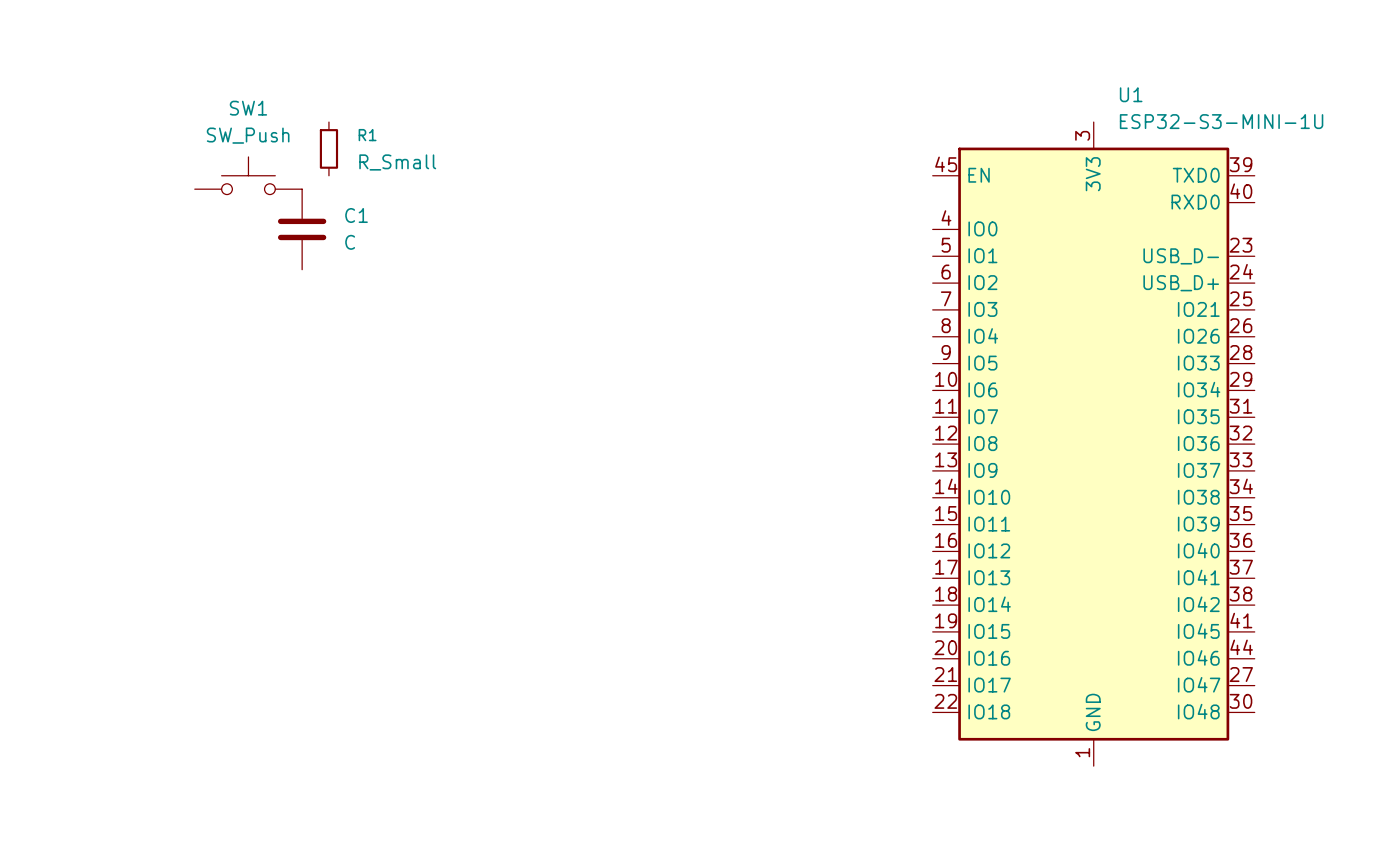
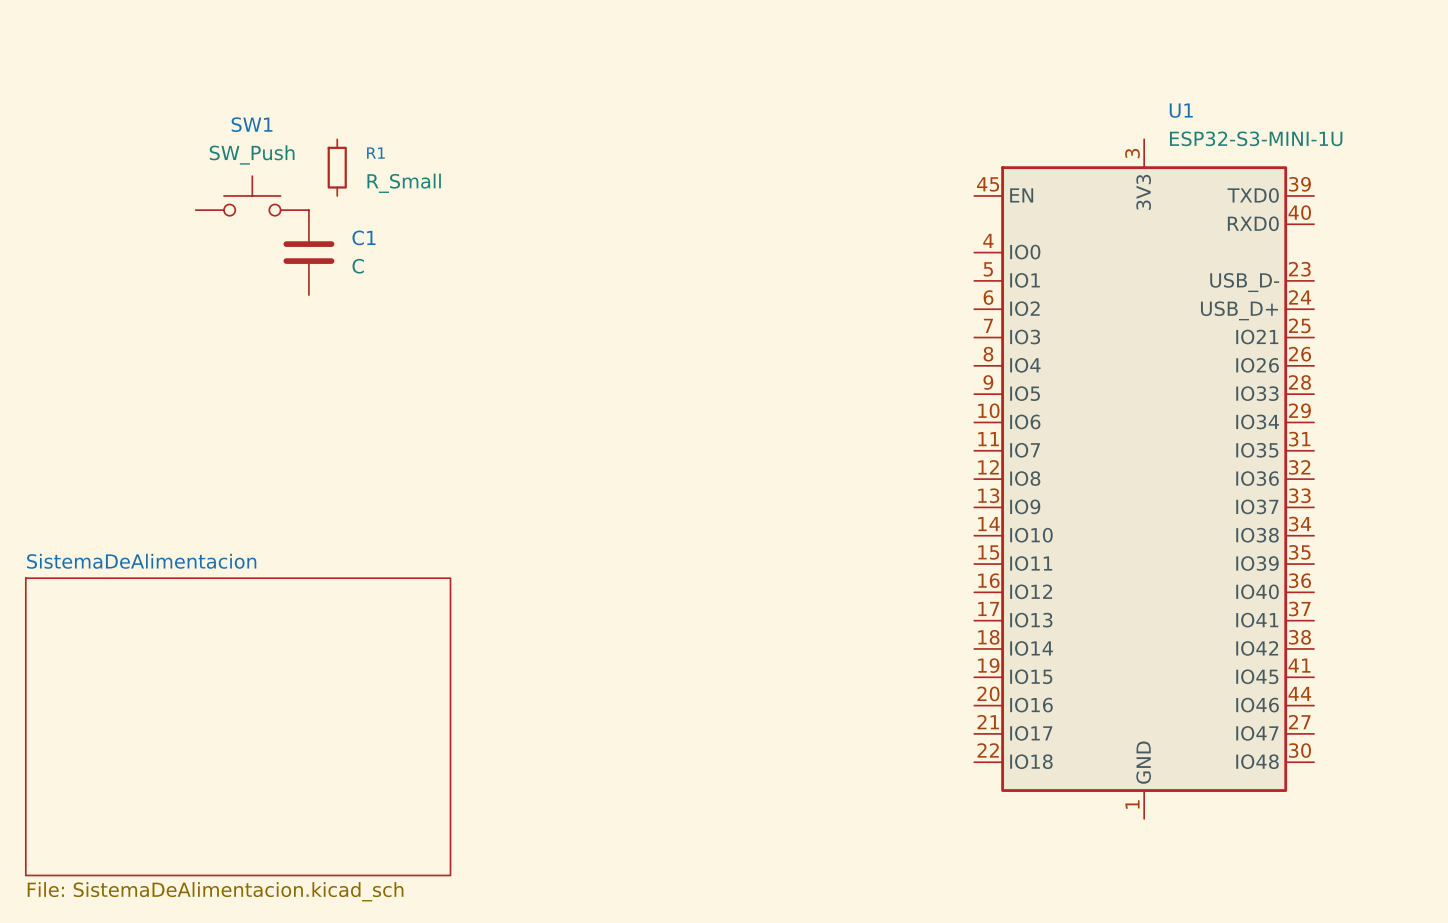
sheet SistemaDeAlimentacion: none -> File: SistemaDeAlimentacion.kicad_sch (238, 726)

